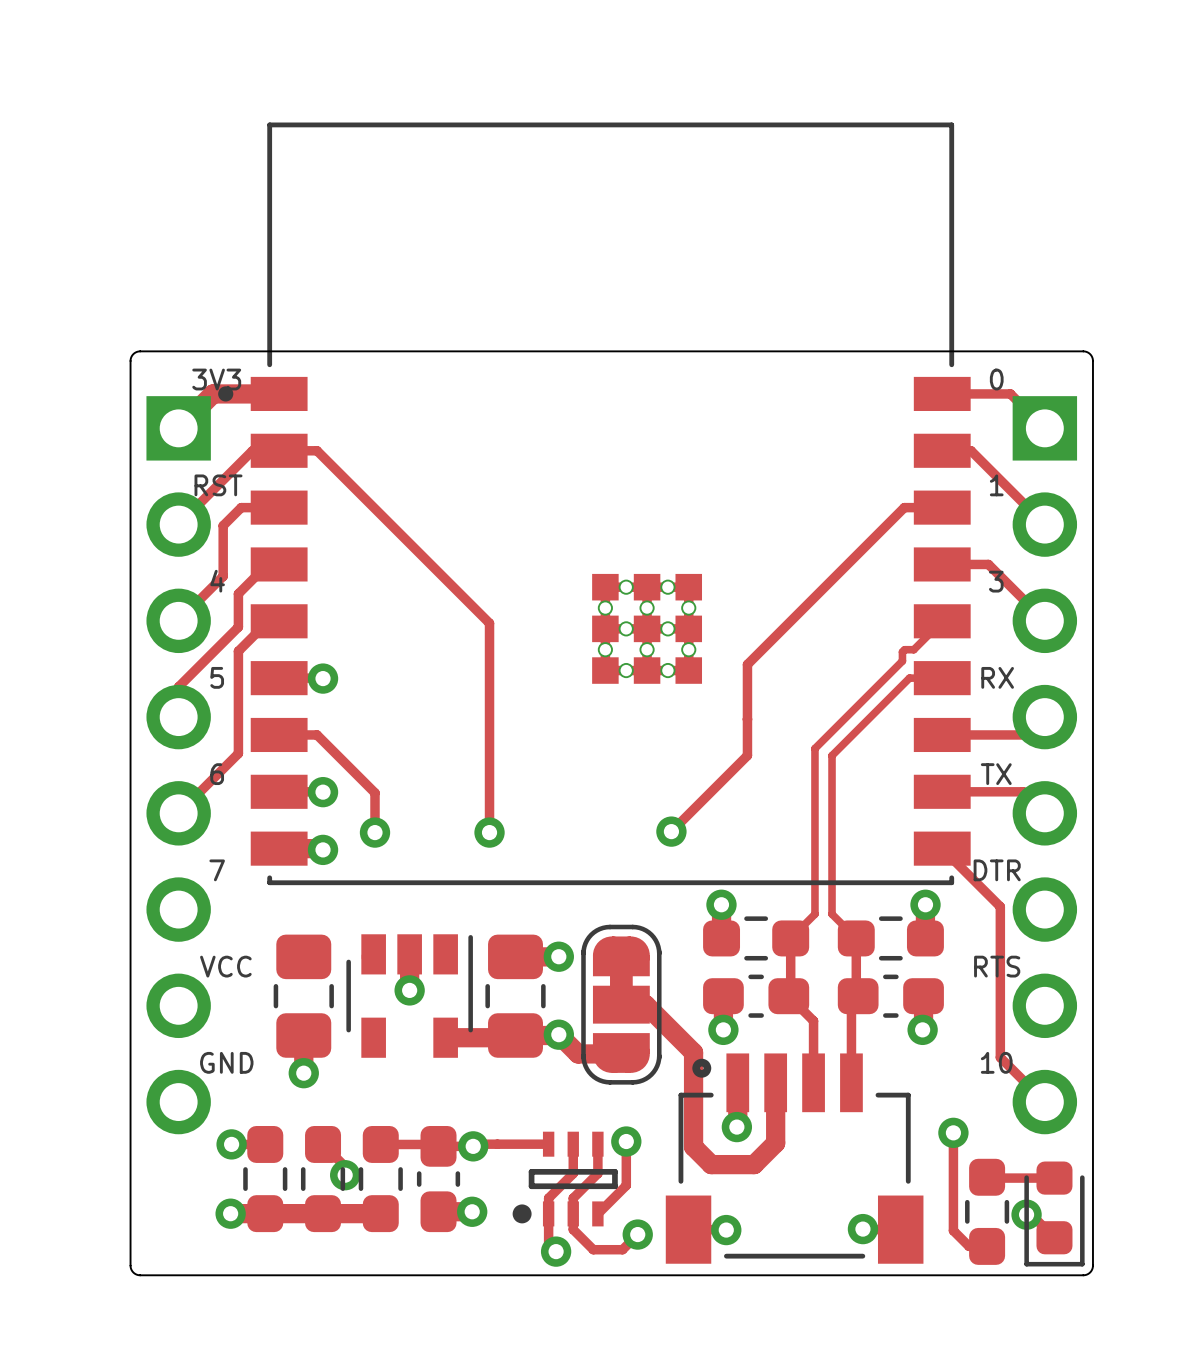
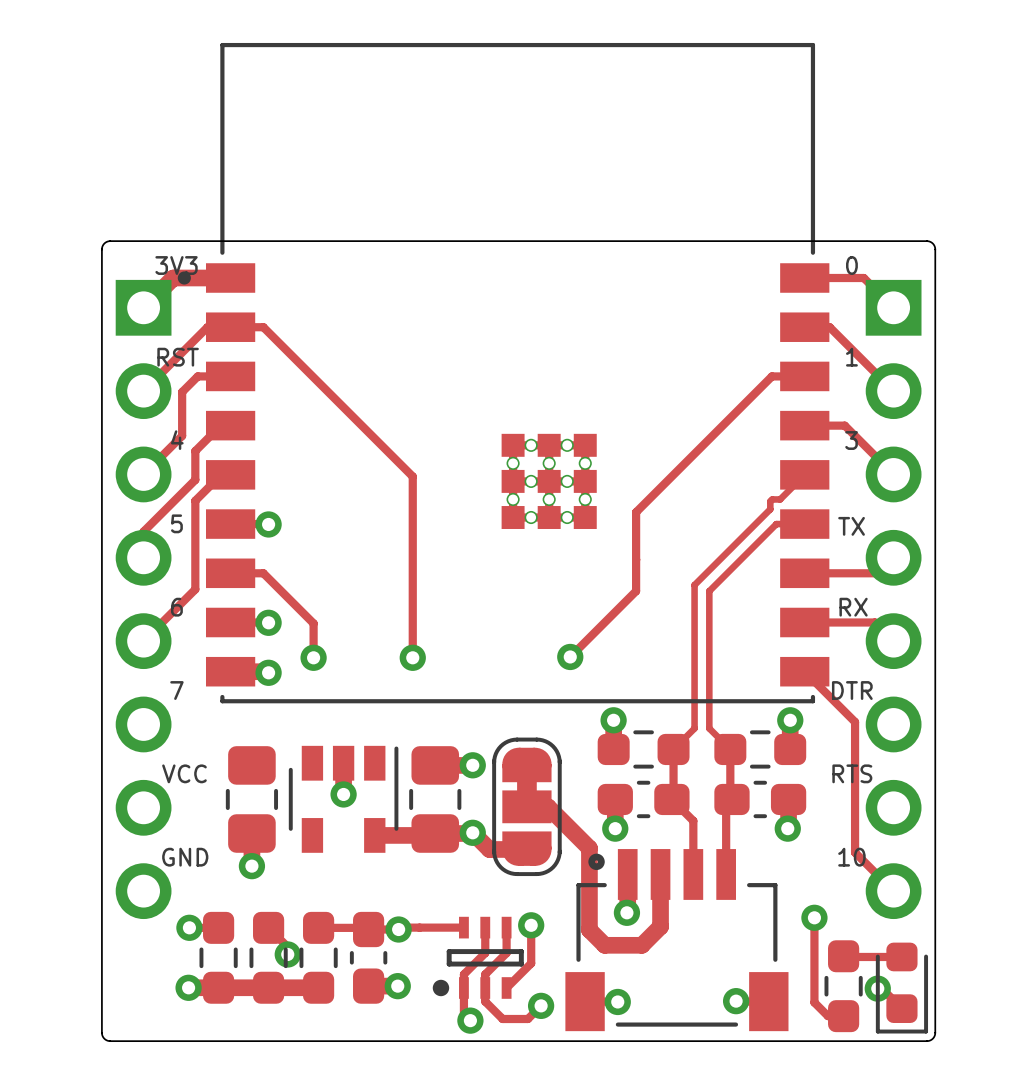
text: RX (997, 677) -> TX (851, 526)
text: TX (996, 774) -> RX (853, 607)

